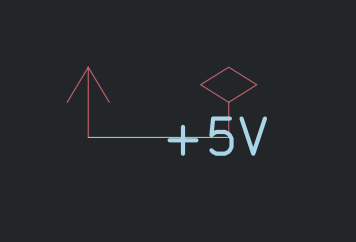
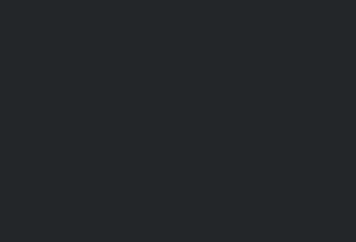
power symbol: +5V (88, 102) -> none
power symbol: (228, 102) -> none
wire: (88, 137) (228, 137) -> none

